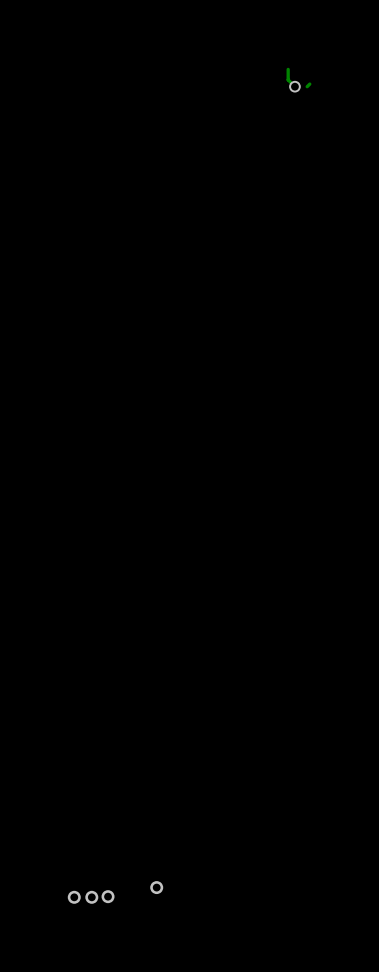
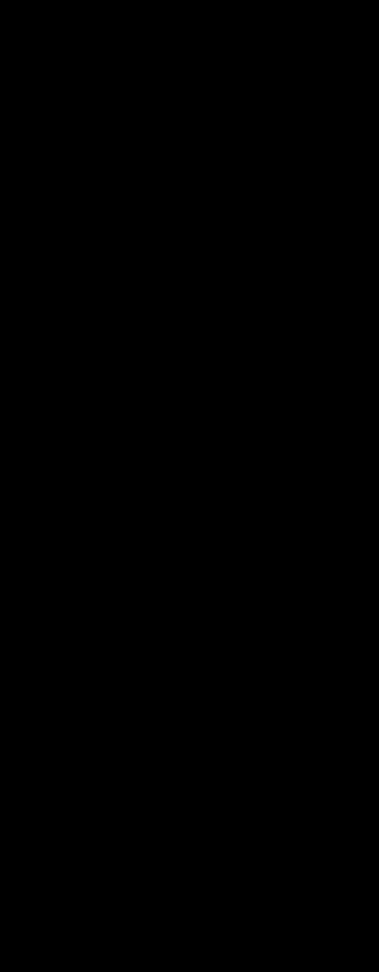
bottom track: (288, 69) (288, 79) (294, 86) -> none
bottom track: (309, 84) (307, 86) -> none
via: (294, 86) -> none
via: (156, 887) -> none
via: (108, 896) -> none
via: (74, 897) -> none
via: (91, 897) -> none

